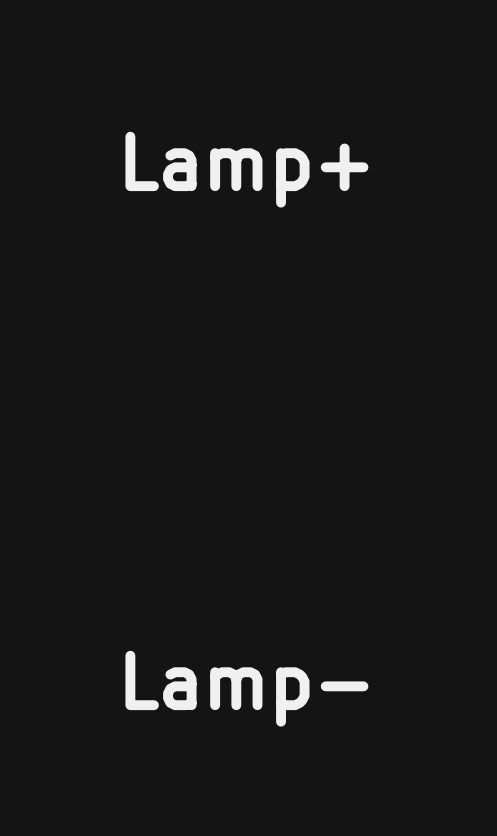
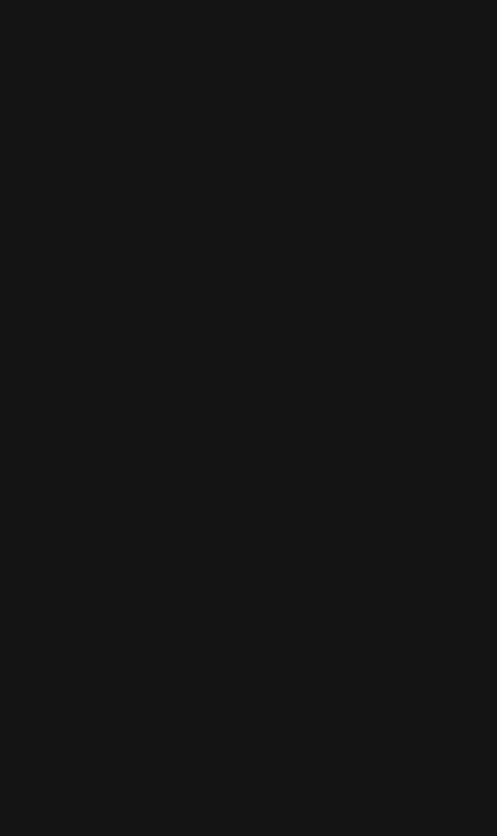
text: Lamp+ (246, 169) -> none
text: Lamp- (246, 688) -> none

